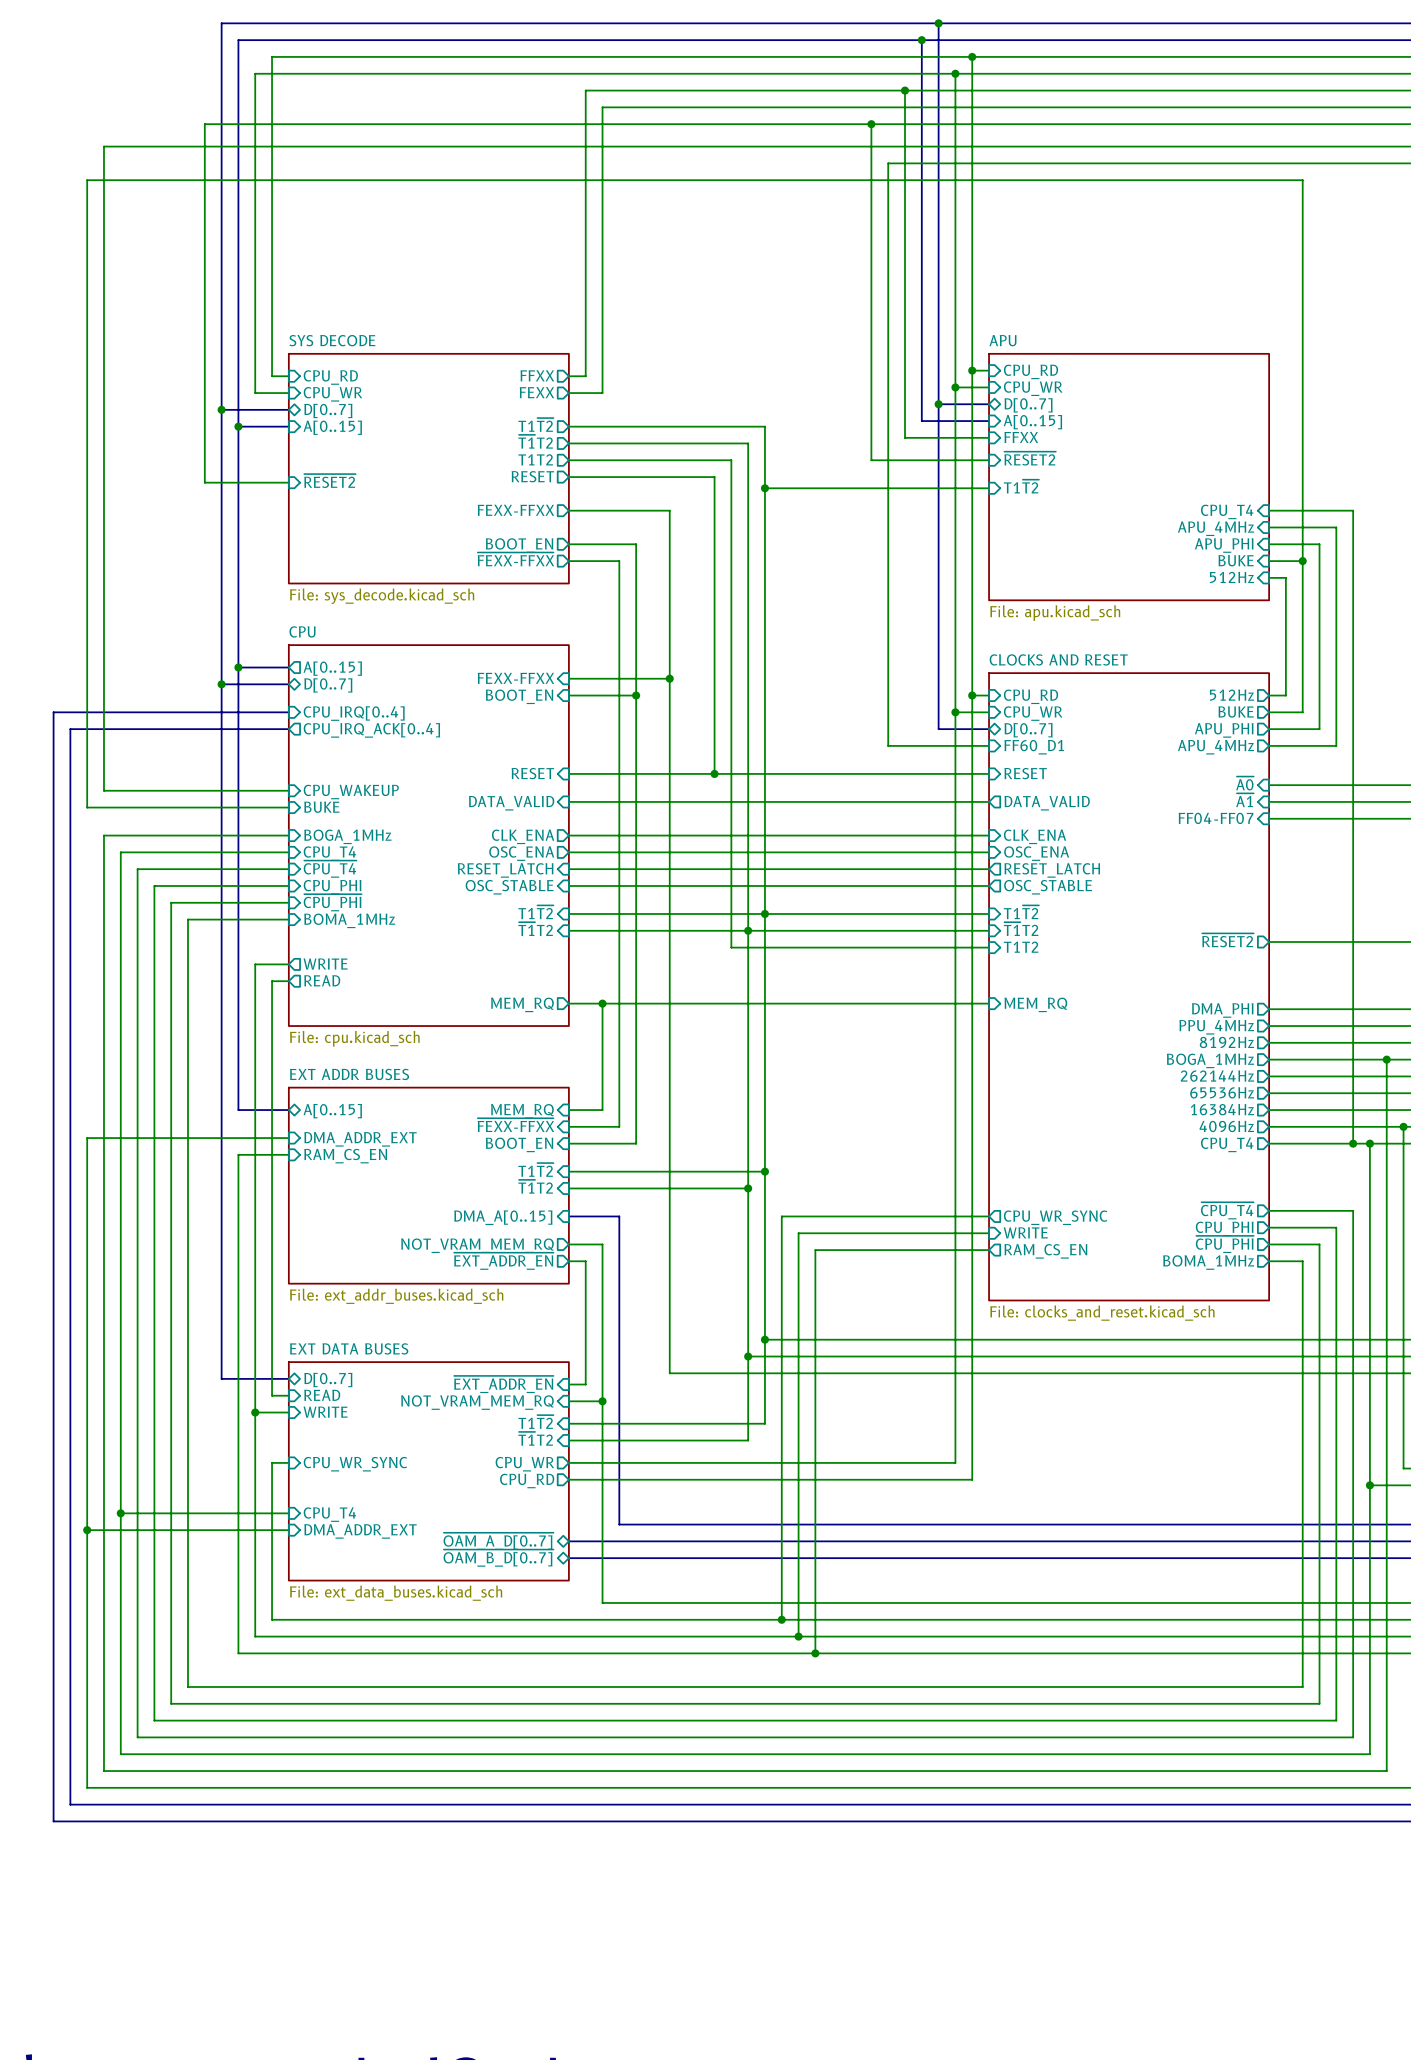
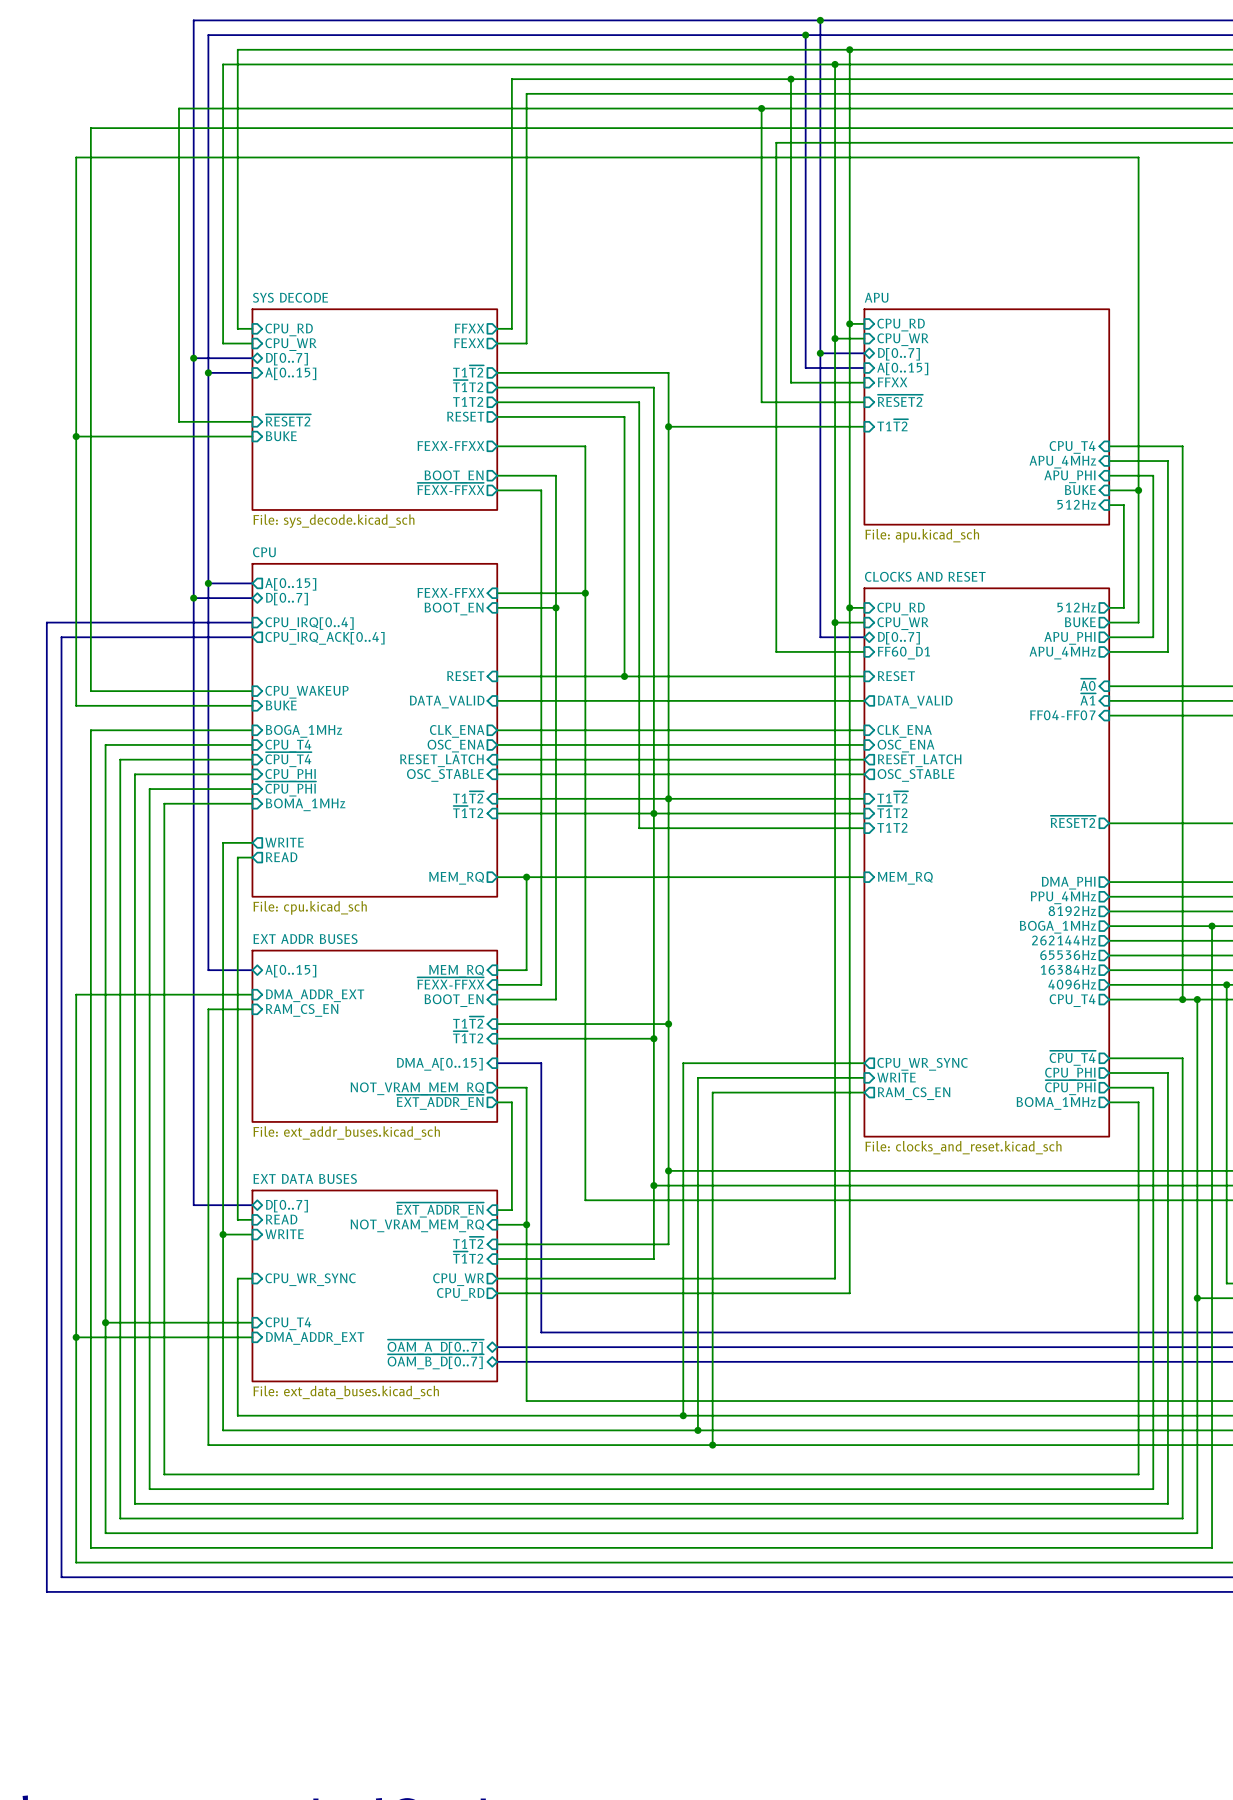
wire: none -> (76, 436) (252, 436)
junction: none -> (76, 436)
sheet pin: none -> BUKE (281, 436)

